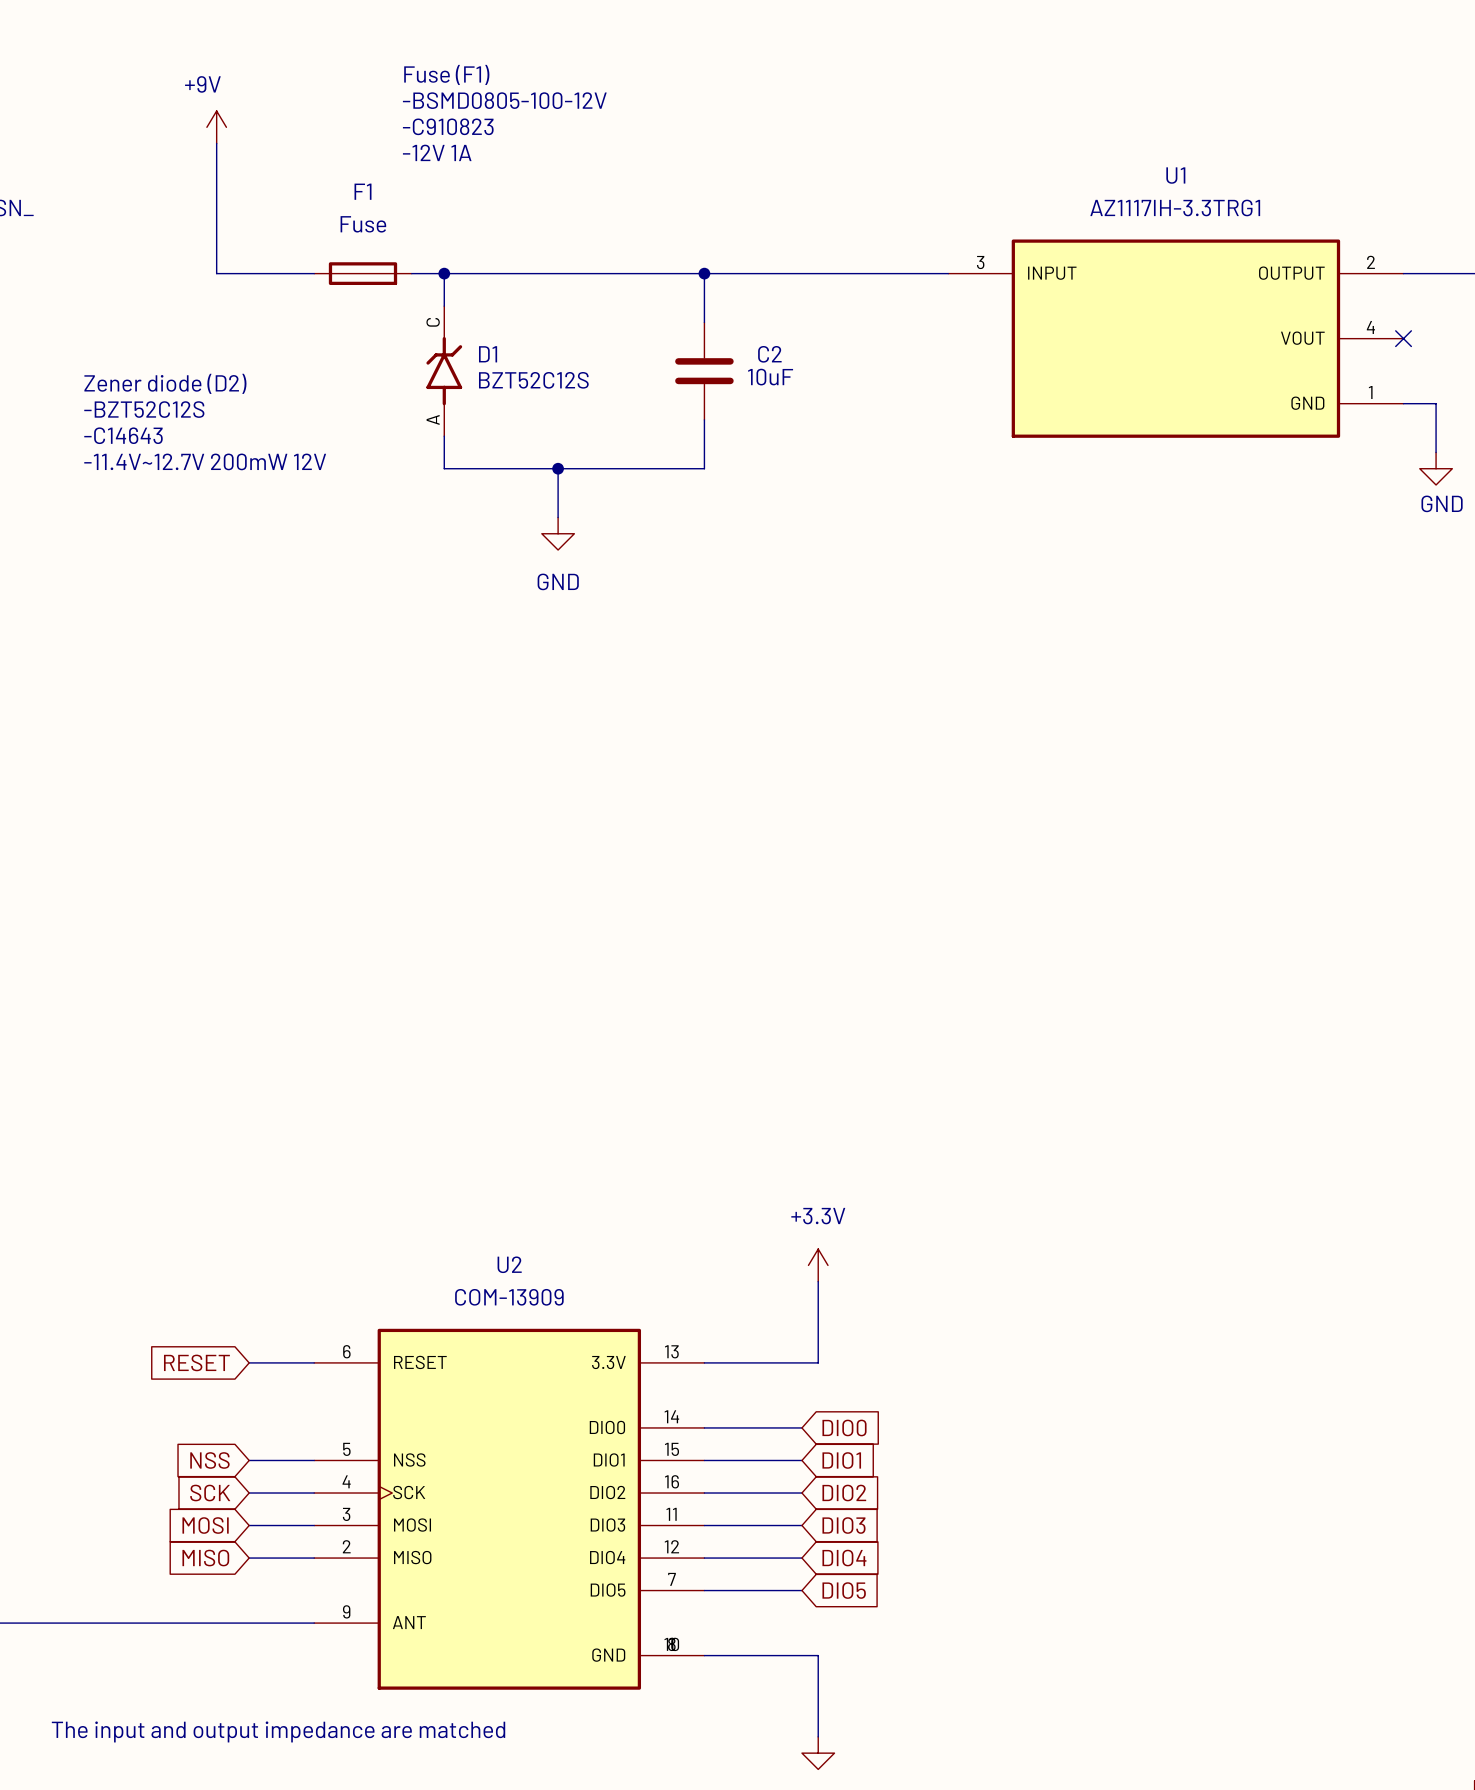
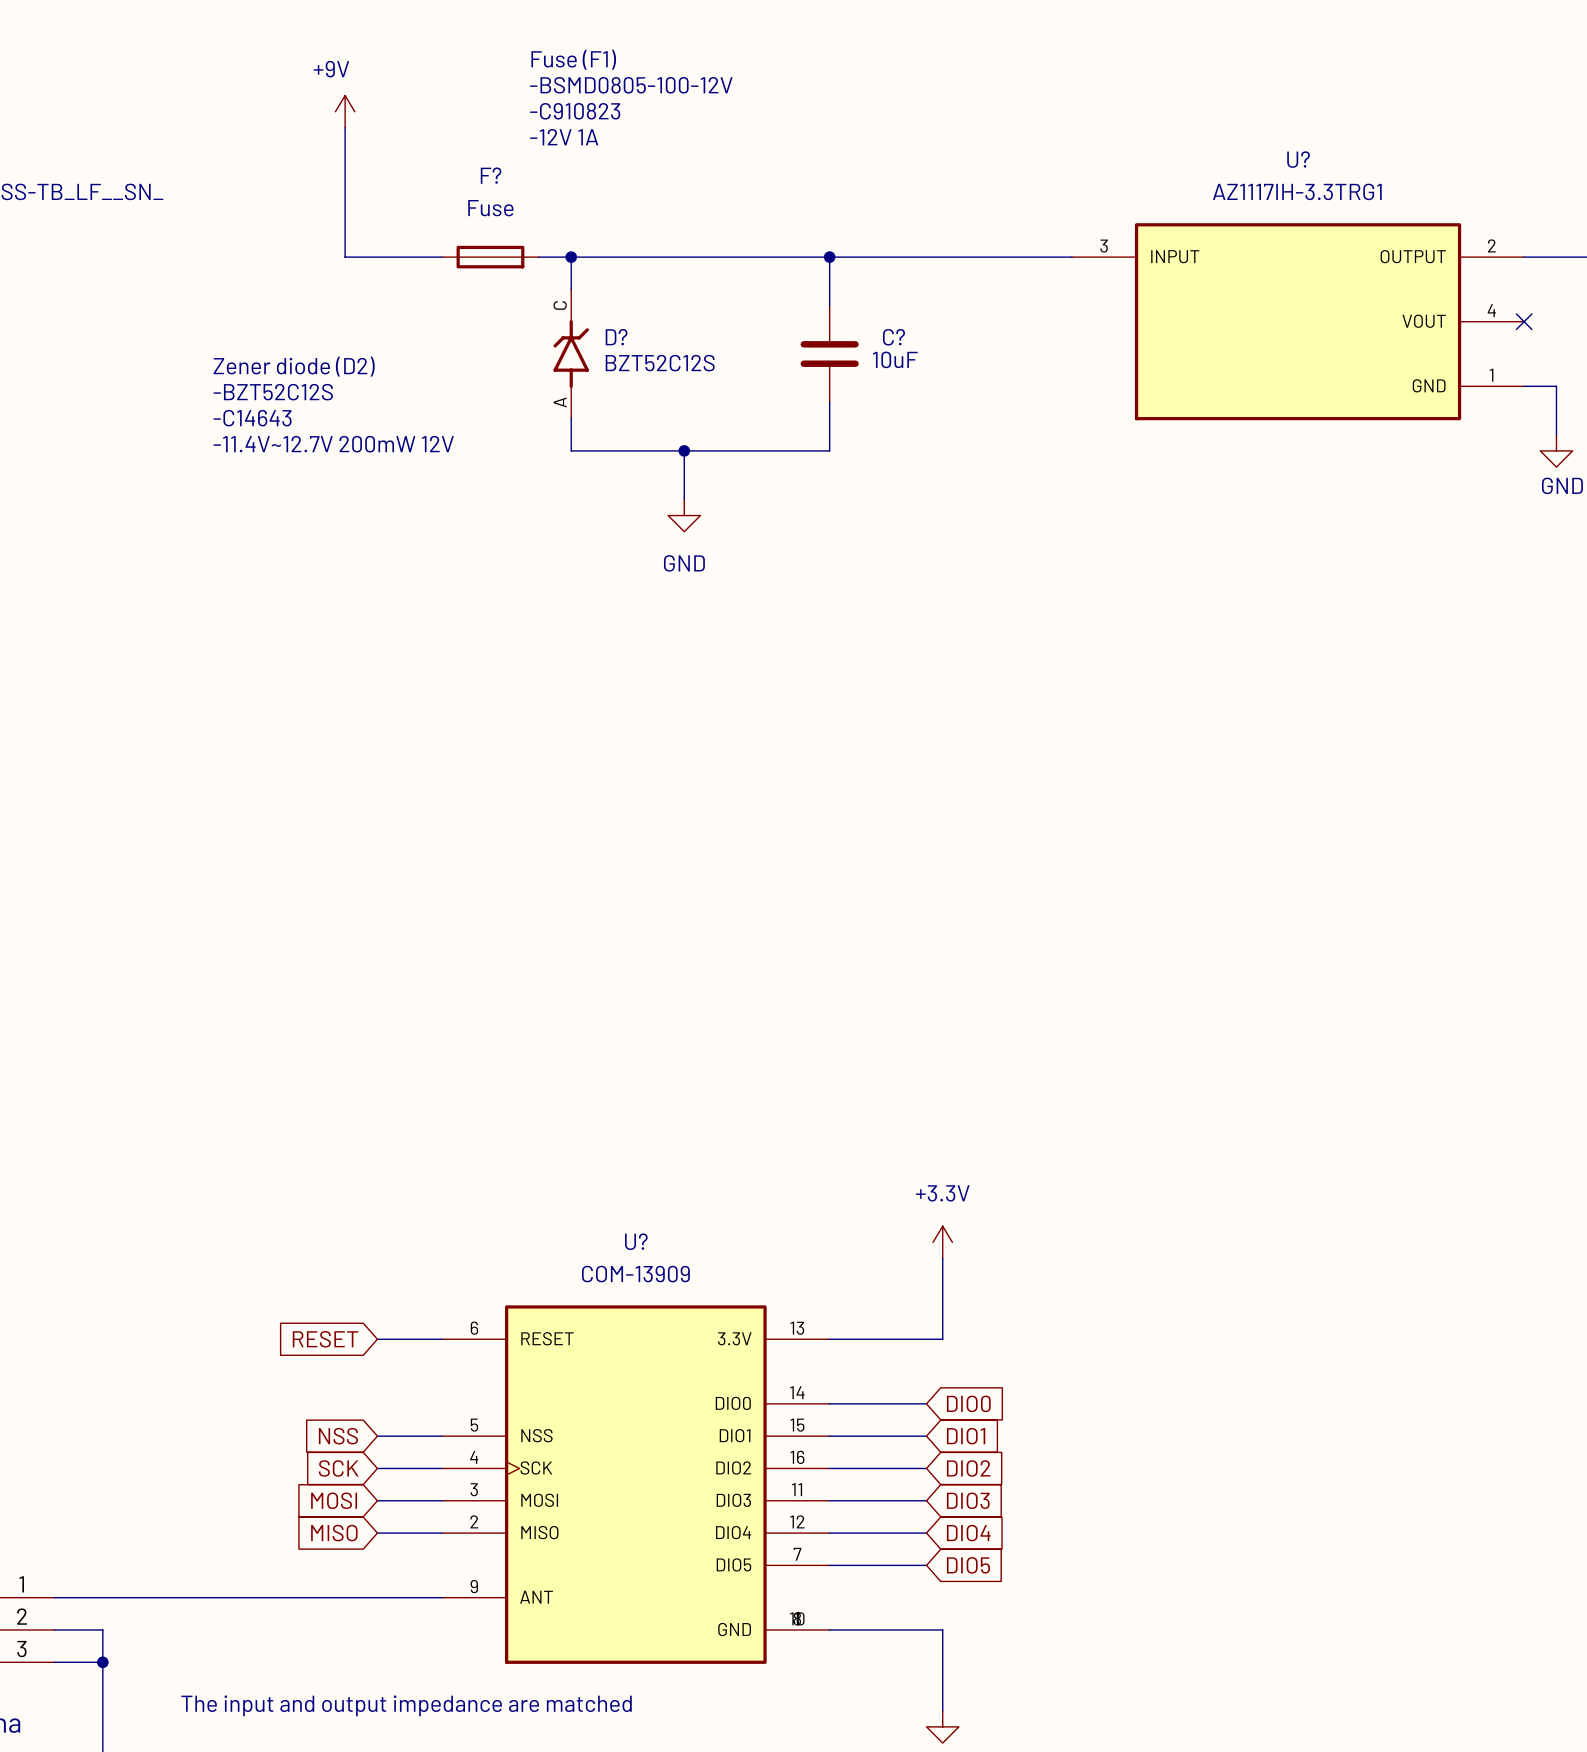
U1 name: U1 (1175, 175) -> U? (1298, 159)
F1 name: F1 (363, 191) -> F? (491, 175)
D1 name: D1 (488, 354) -> D? (616, 337)
C2 name: C2 (769, 354) -> C? (894, 337)
U2 name: U2 (509, 1264) -> U? (636, 1241)

